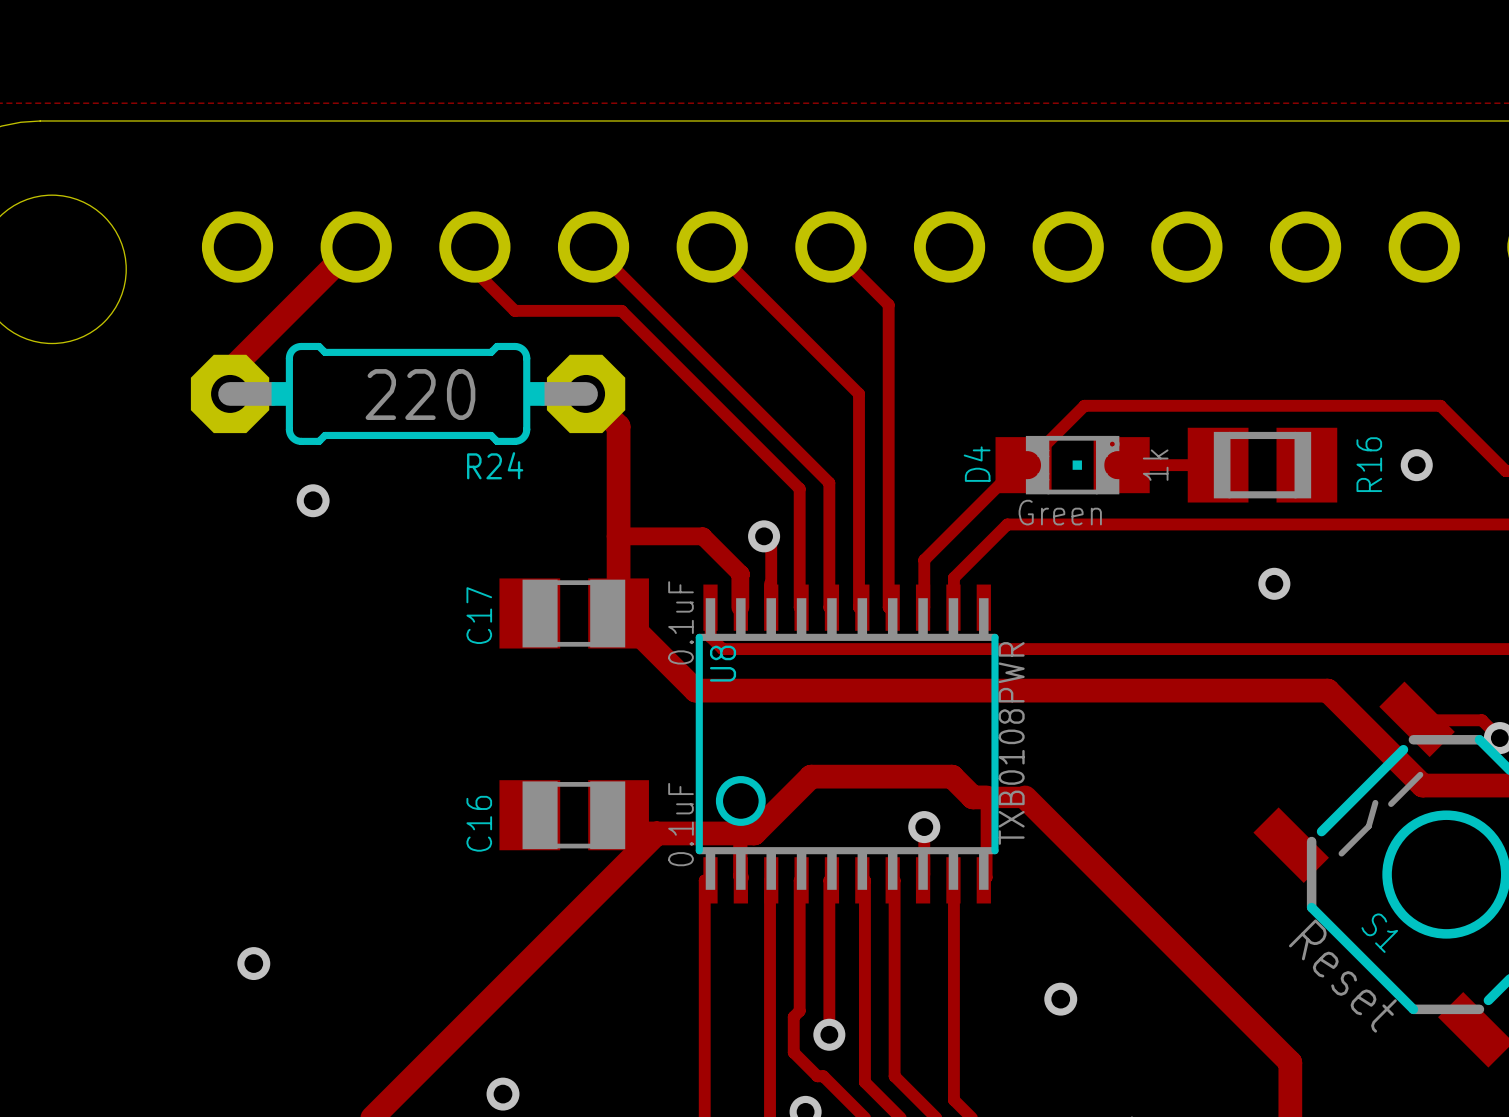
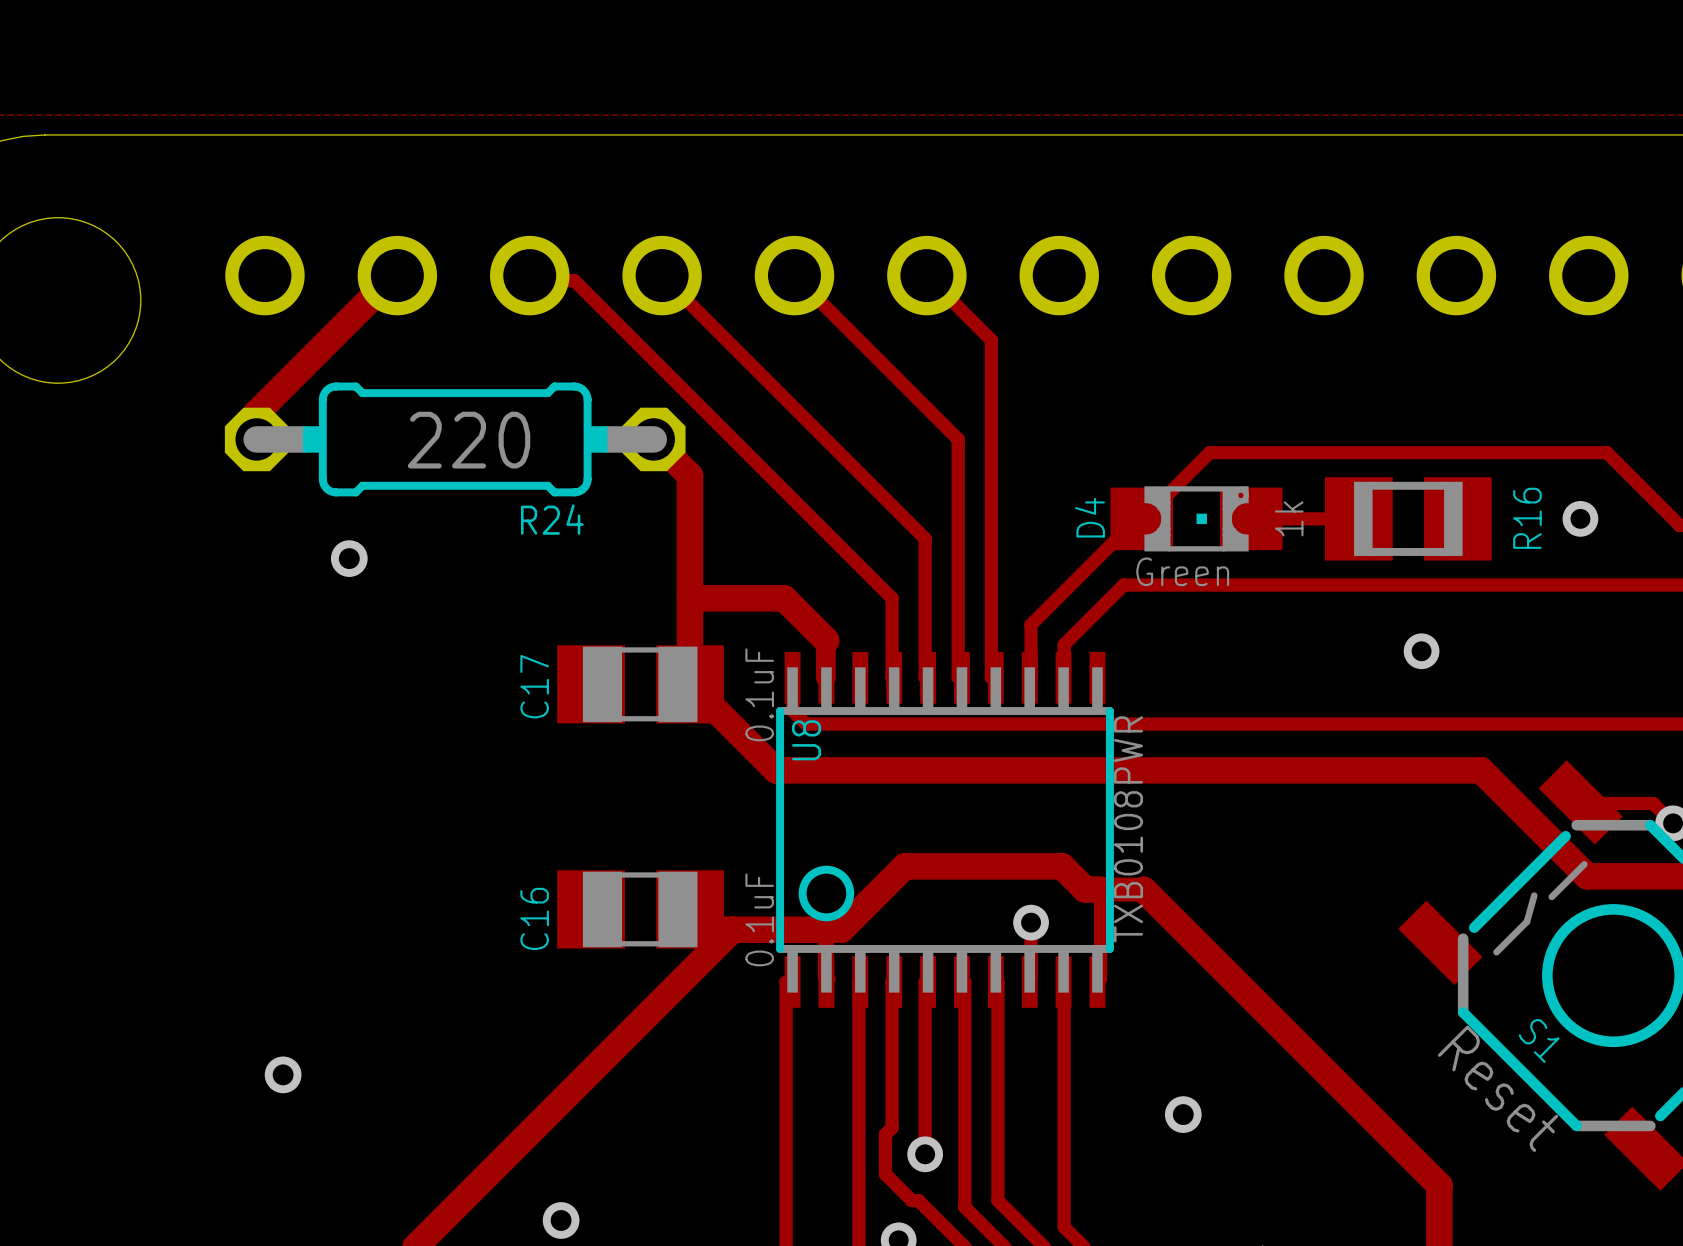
track: (474, 247) (474, 270) (514, 310) (621, 310) (799, 488) (799, 536) -> (529, 275) (534, 280) (574, 280) (892, 598)
R24 footprint: [190, 342, 626, 445] -> [224, 382, 686, 497]
track width: thin (618, 536) (702, 536) (740, 574) -> thick (690, 598) (784, 598) (826, 640)
track: (764, 536) (771, 543) (771, 607) (770, 583) -> none
via: (764, 536) -> none

